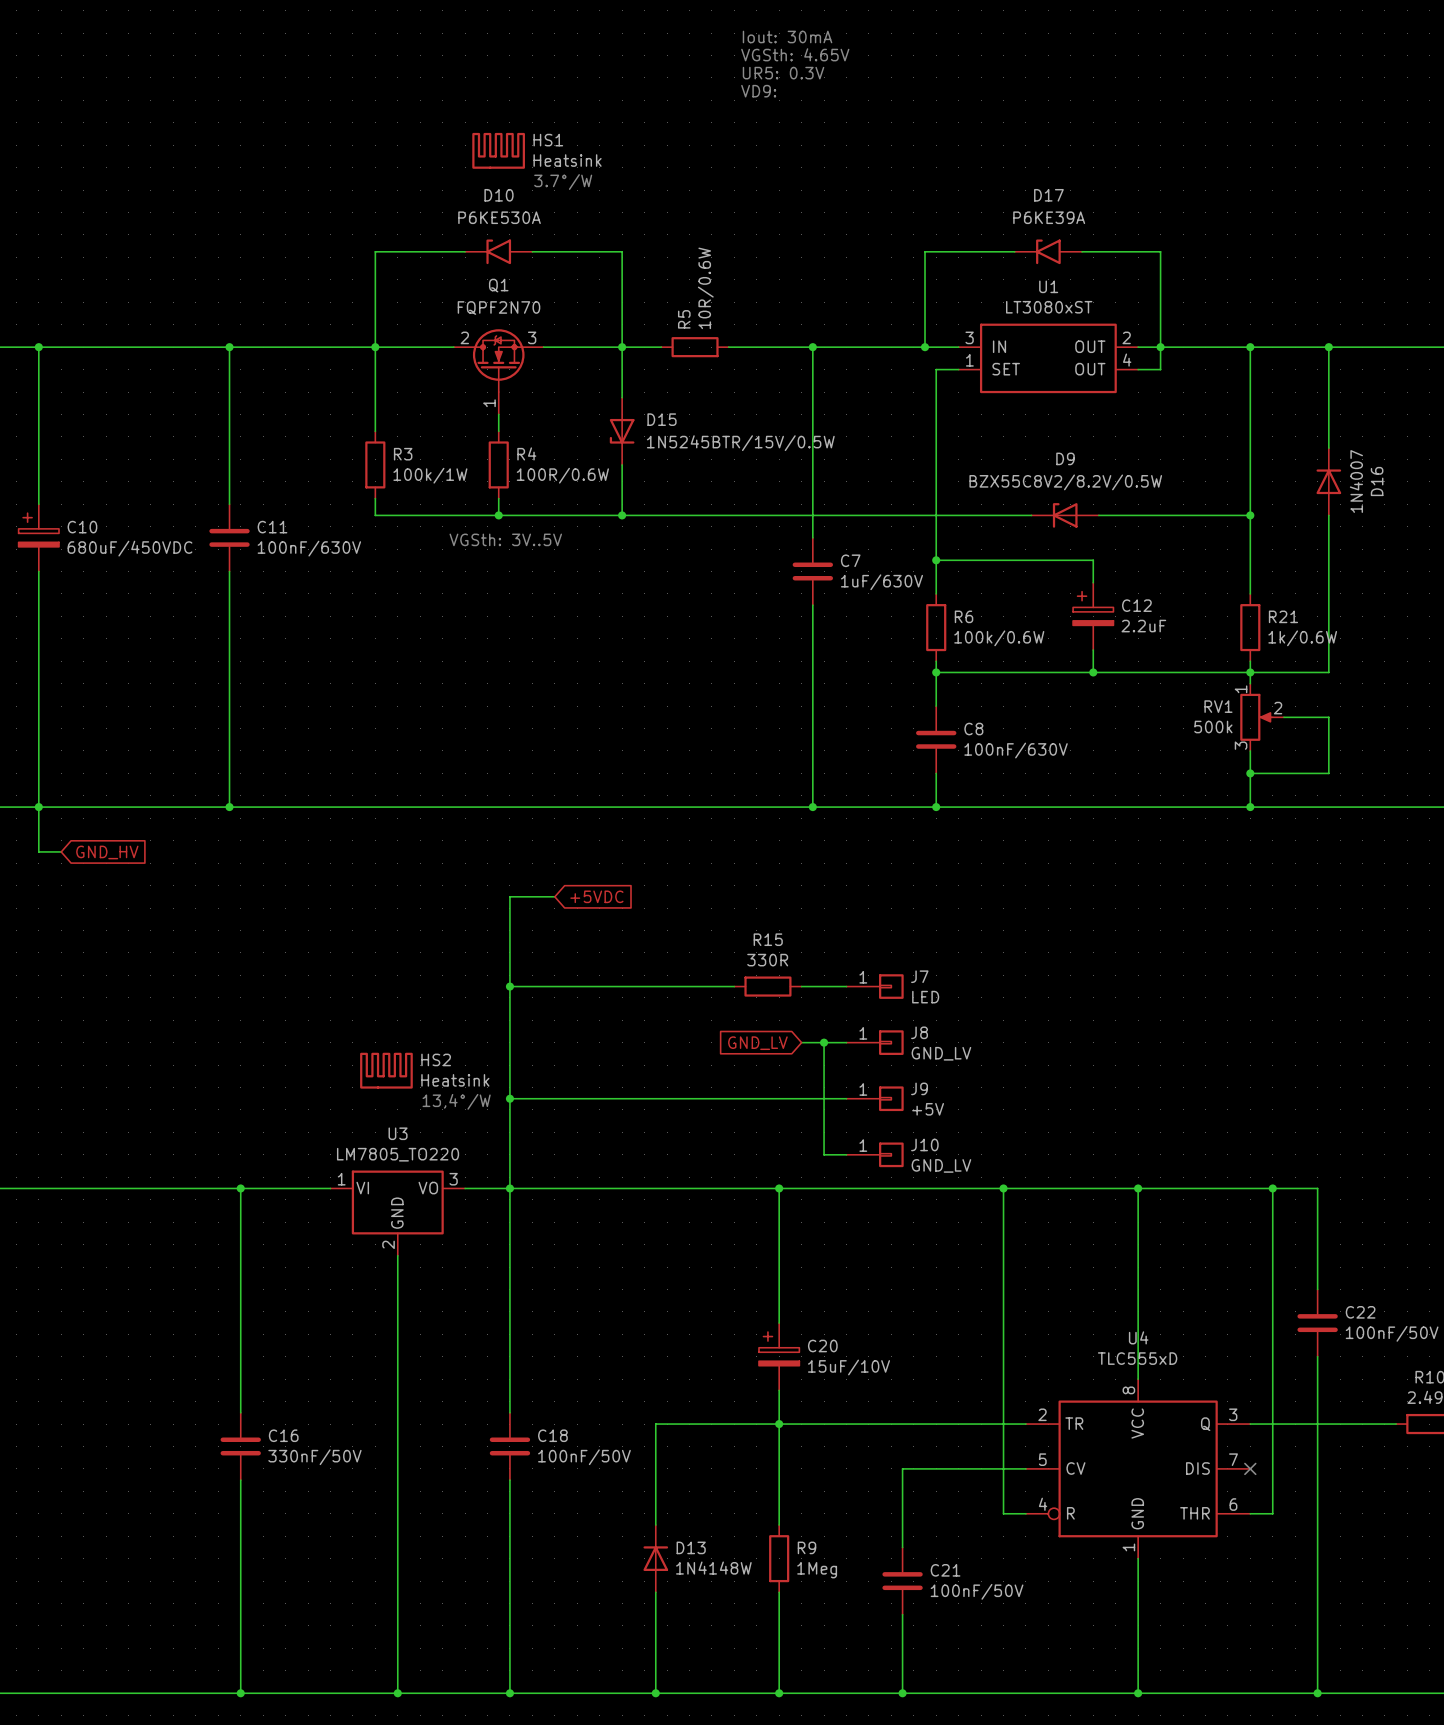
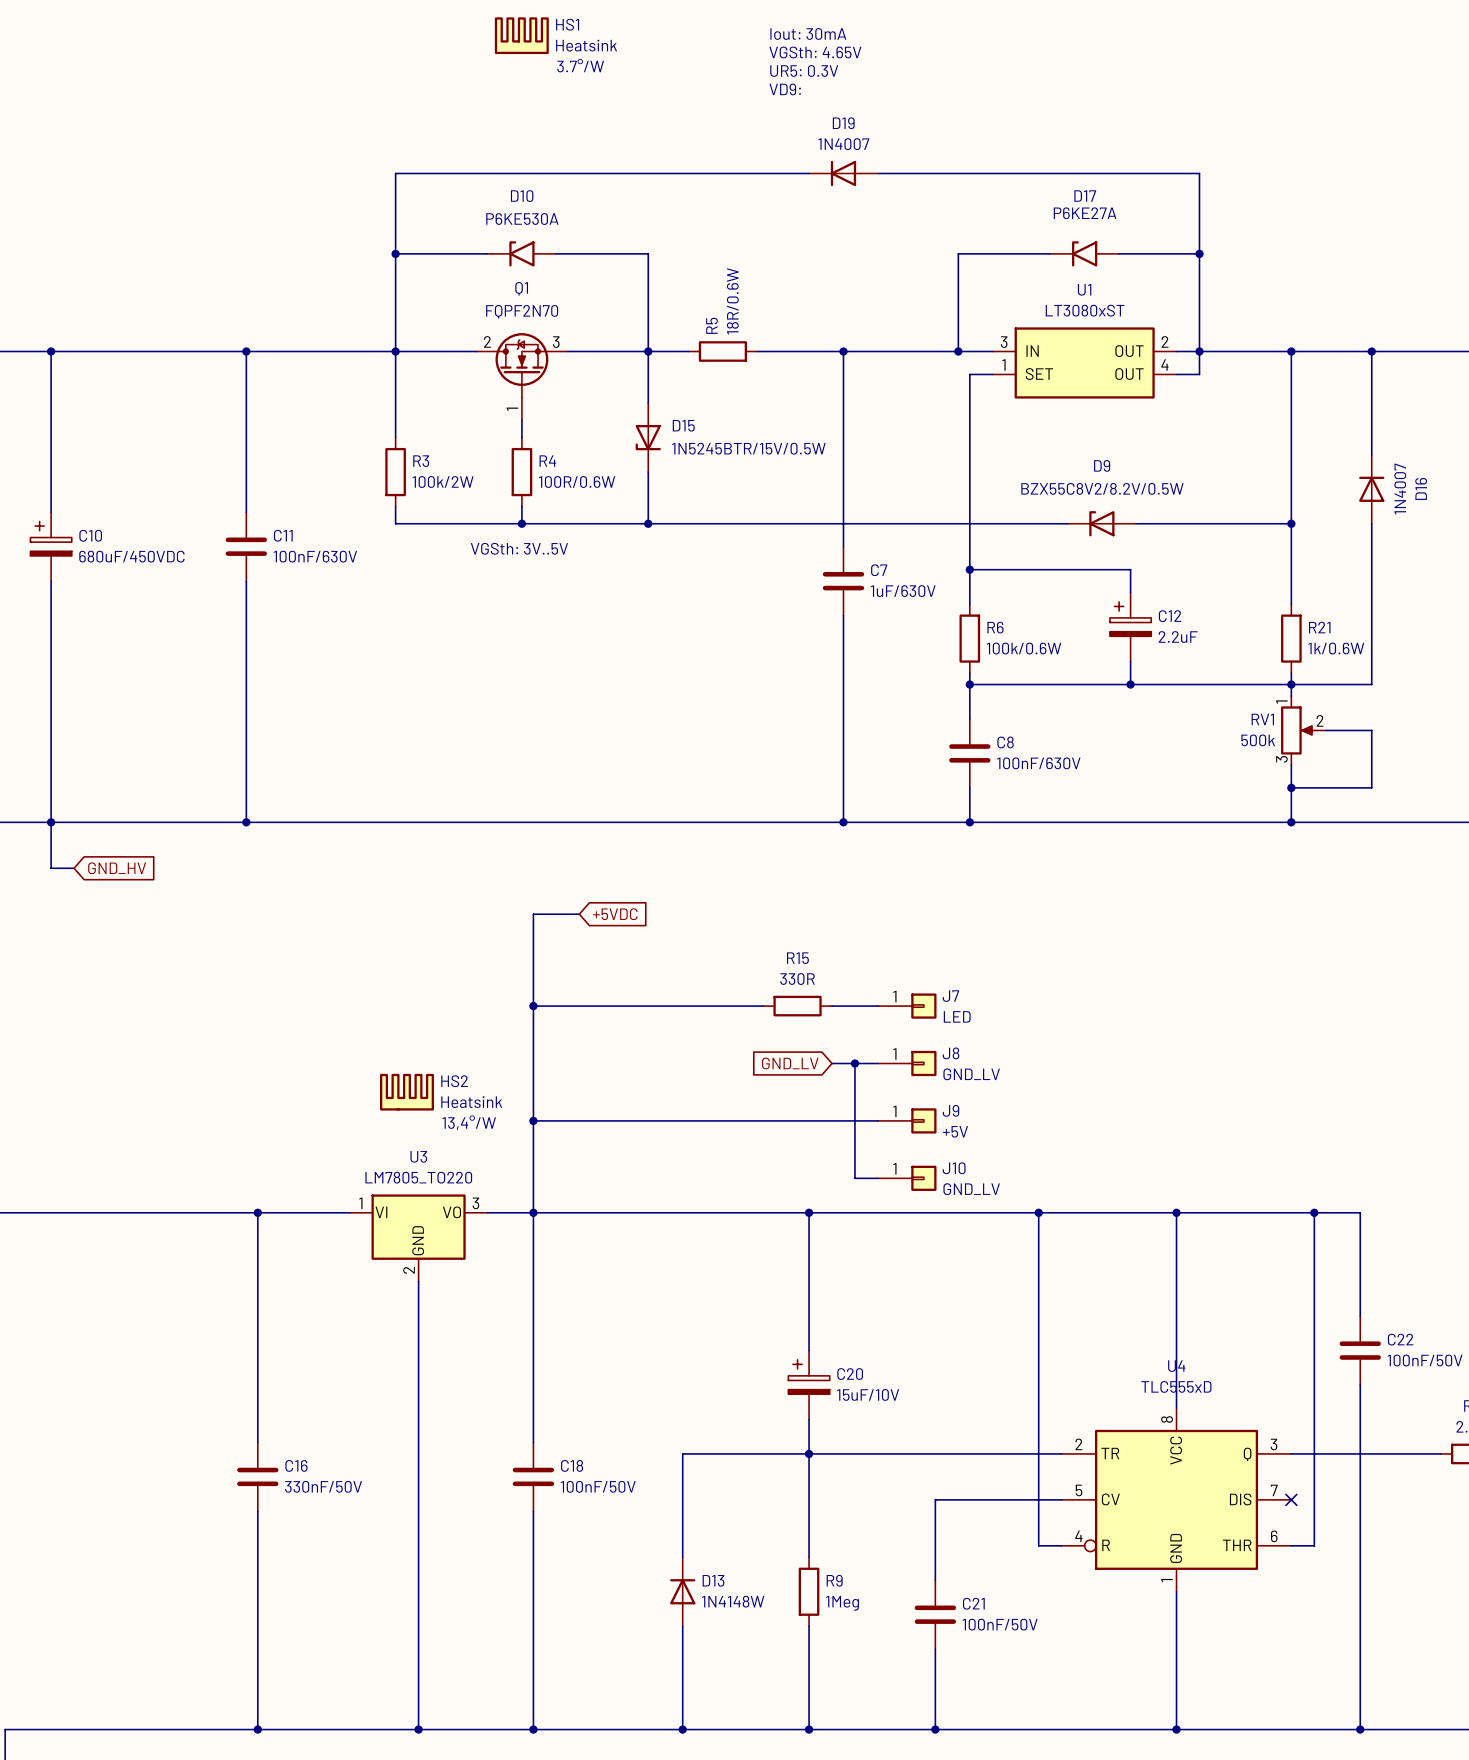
HS1 position: (498, 150) -> (521, 35)
wire: none -> (809, 173) (395, 173) (395, 253)
D19: none -> 1N4007 (843, 173)
wire: none -> (877, 173) (1199, 173) (1199, 253)
text position: 3.7°/W (563, 181) -> 3.7°/W (580, 65)
D17 value: P6KE39A (1049, 217) -> P6KE27A (1085, 213)
junction: none -> (395, 253)
junction: none -> (1199, 253)
R5 value: 10R/0.6W (705, 288) -> 18R/0.6W (732, 301)
R3 value: 100k/1W (430, 475) -> 100k/2W (443, 481)

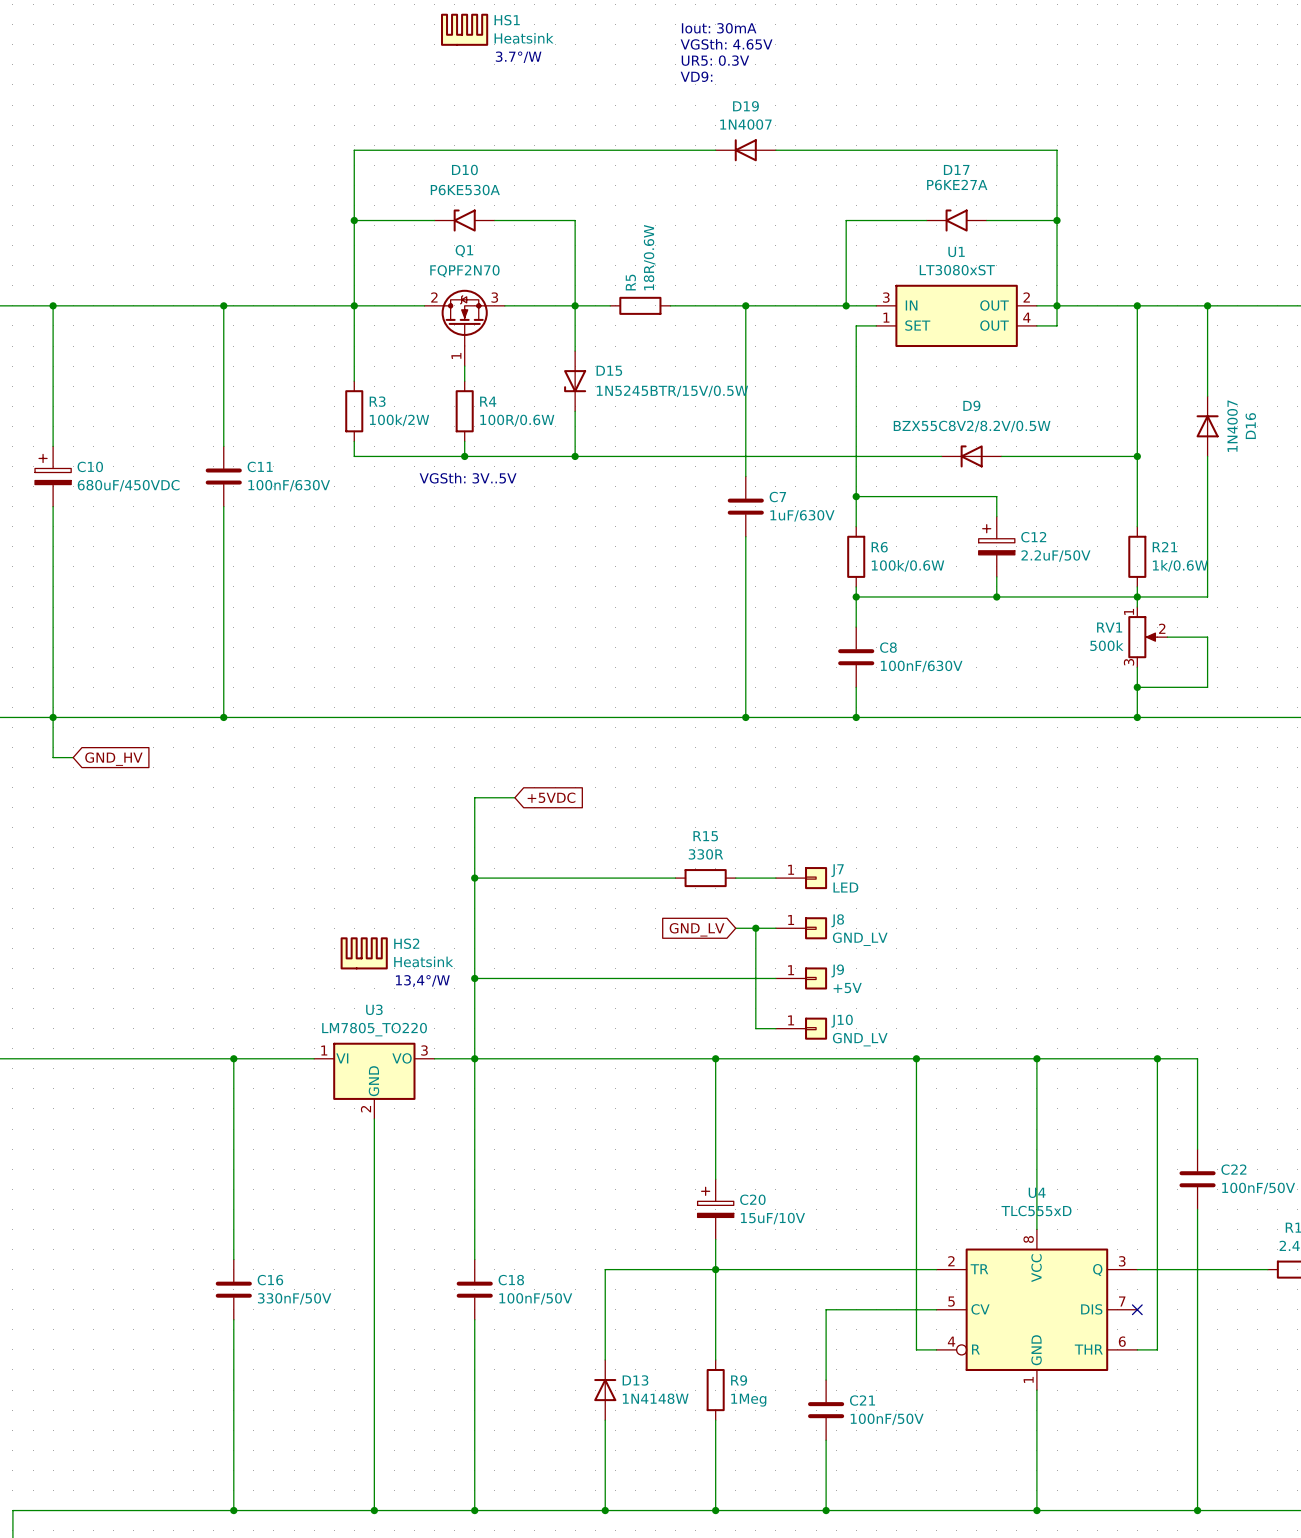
C12 value: 2.2uF (1178, 637) -> 2.2uF/50V (1055, 556)

